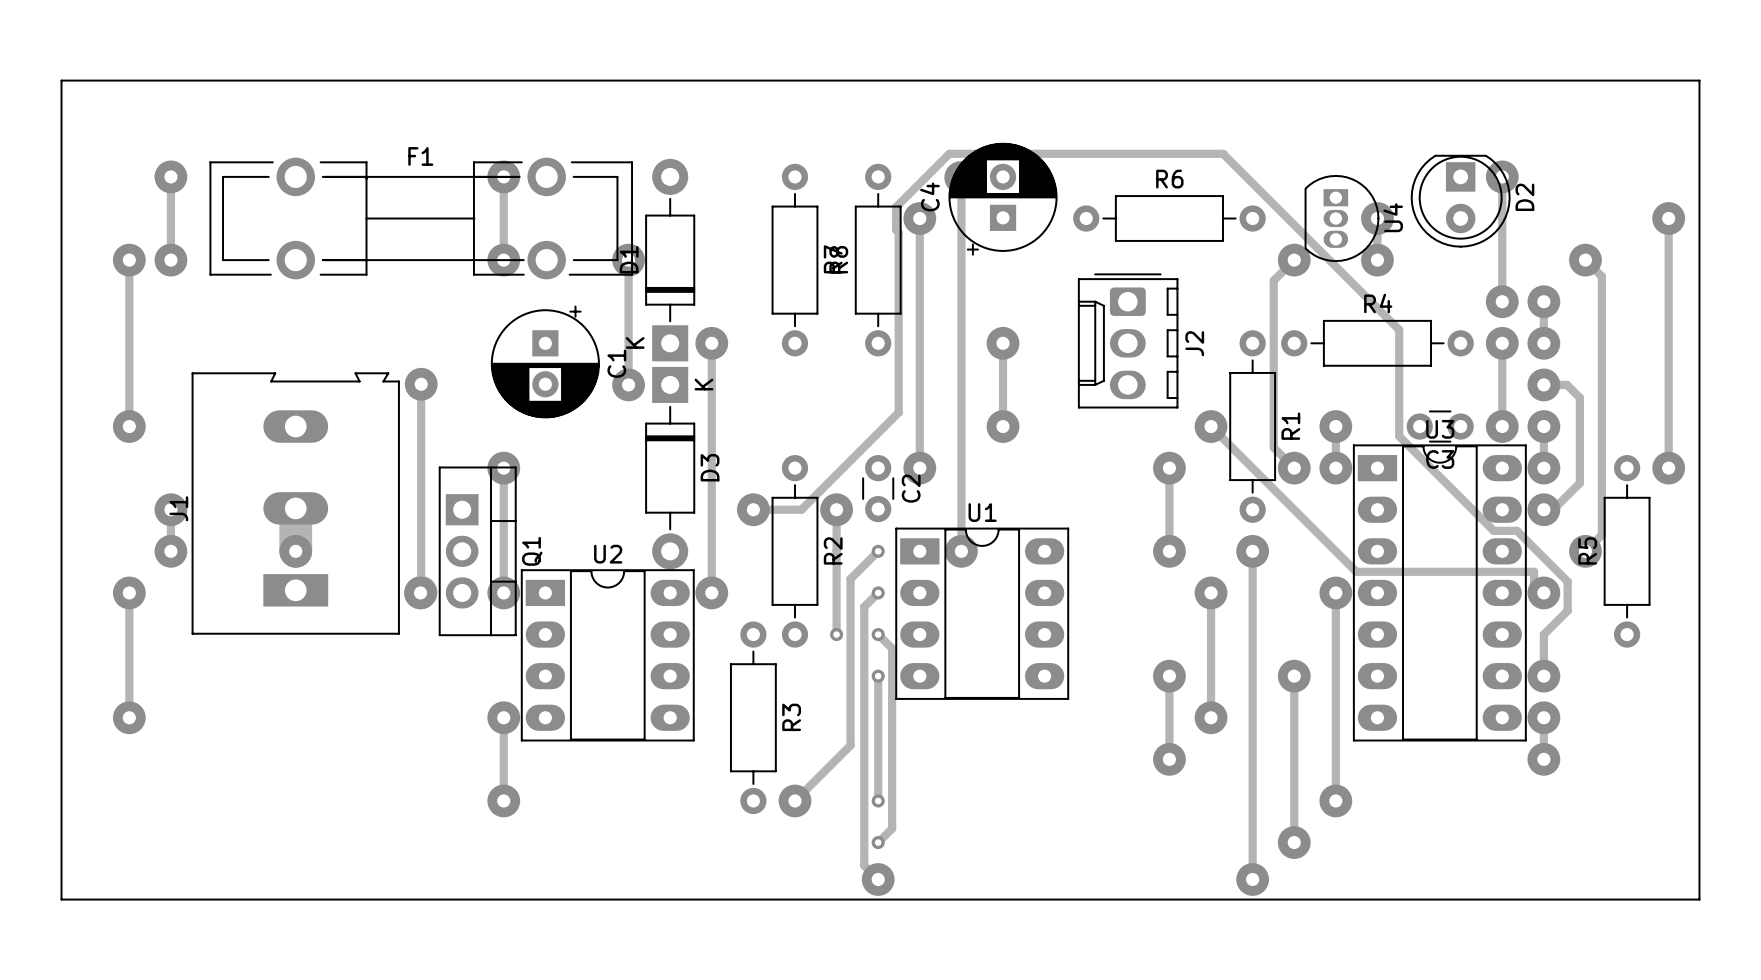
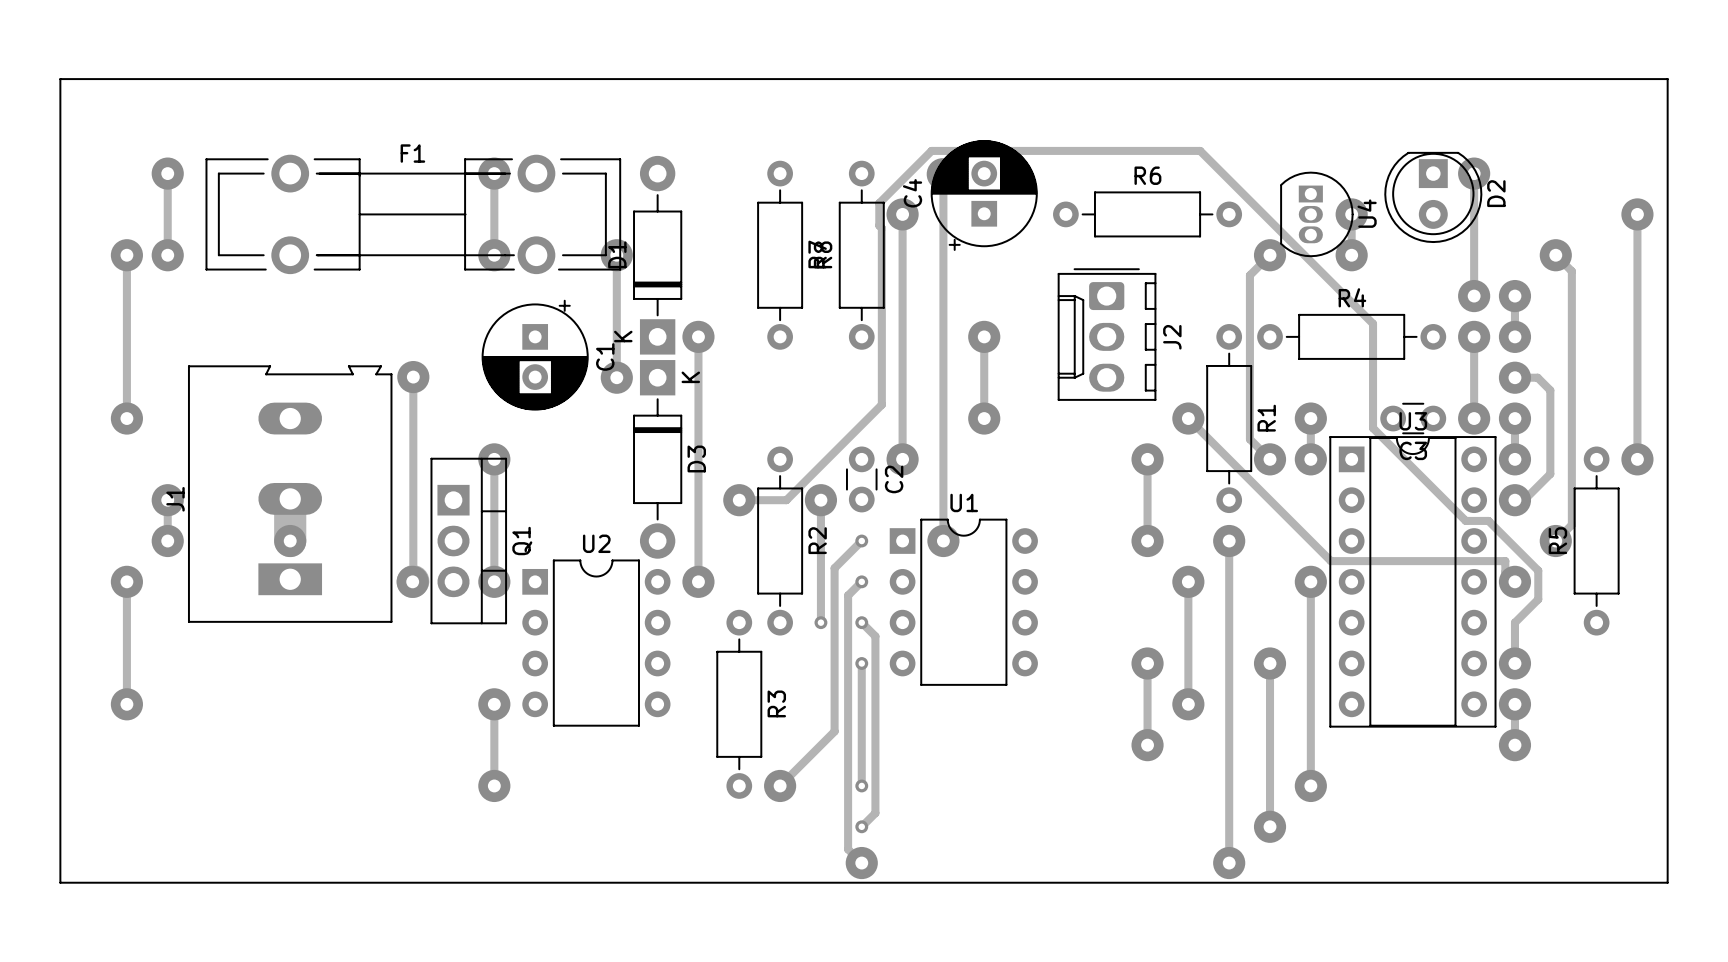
U3 footprint: [1352, 444, 1527, 742] -> [1329, 436, 1497, 728]
U1 footprint: [895, 527, 1070, 700] -> [889, 518, 1038, 686]
U2 footprint: [520, 569, 695, 742] -> [522, 559, 671, 727]

